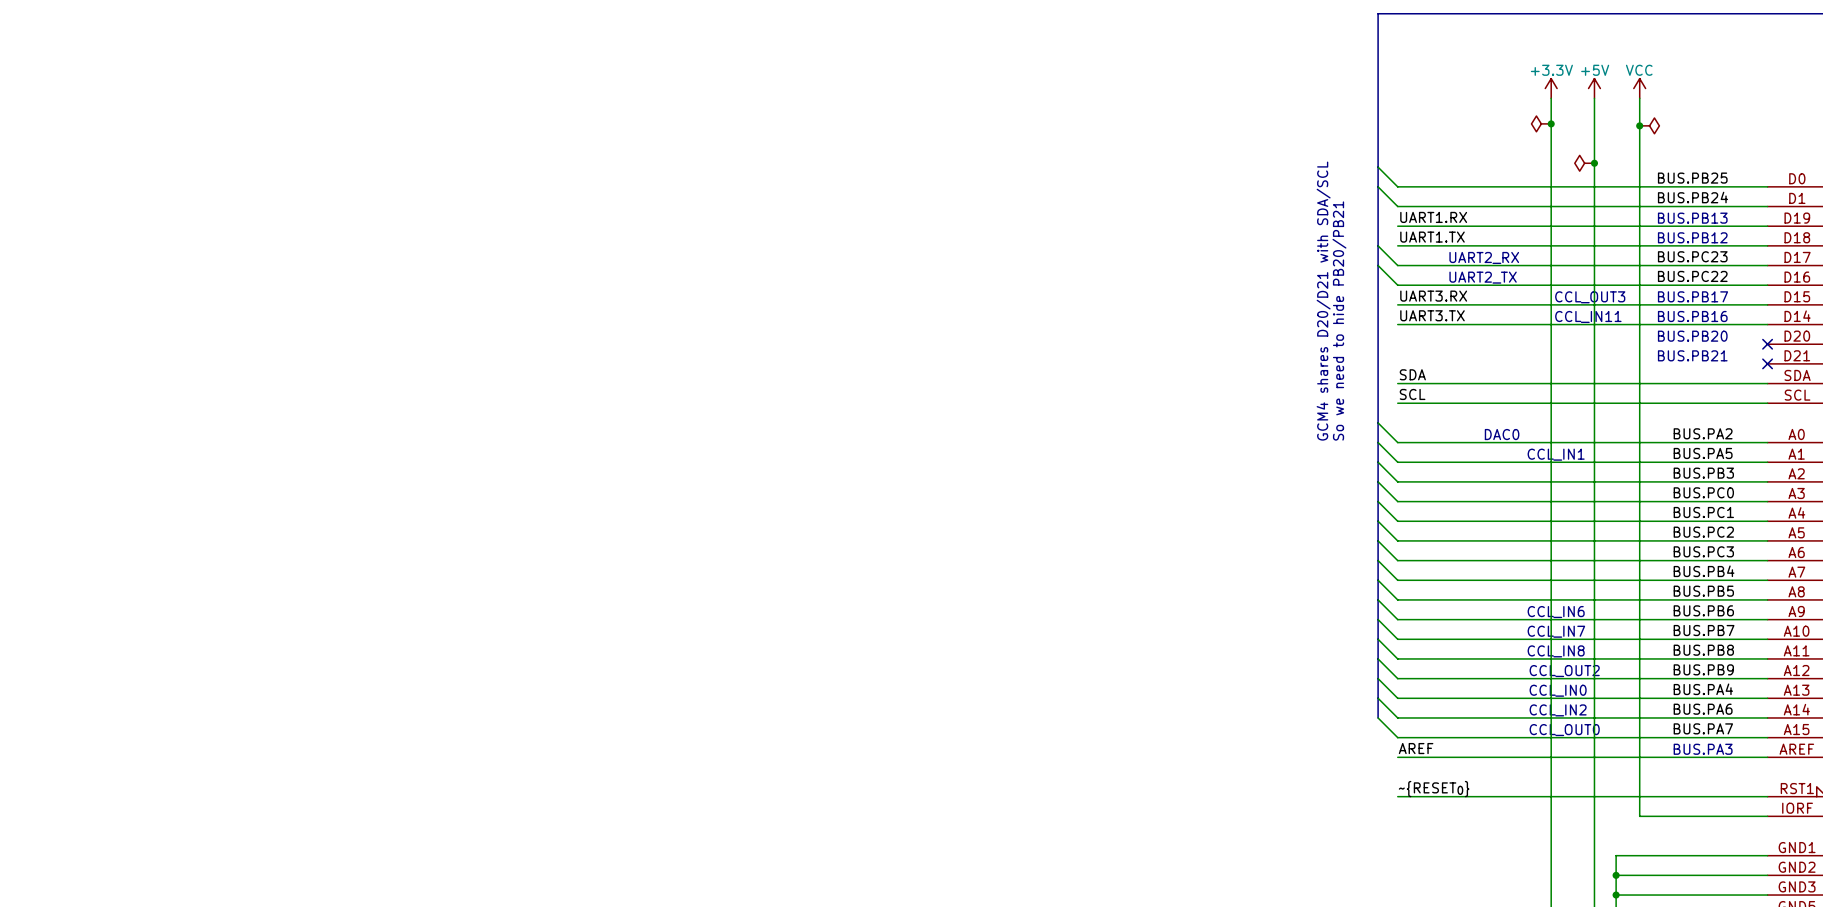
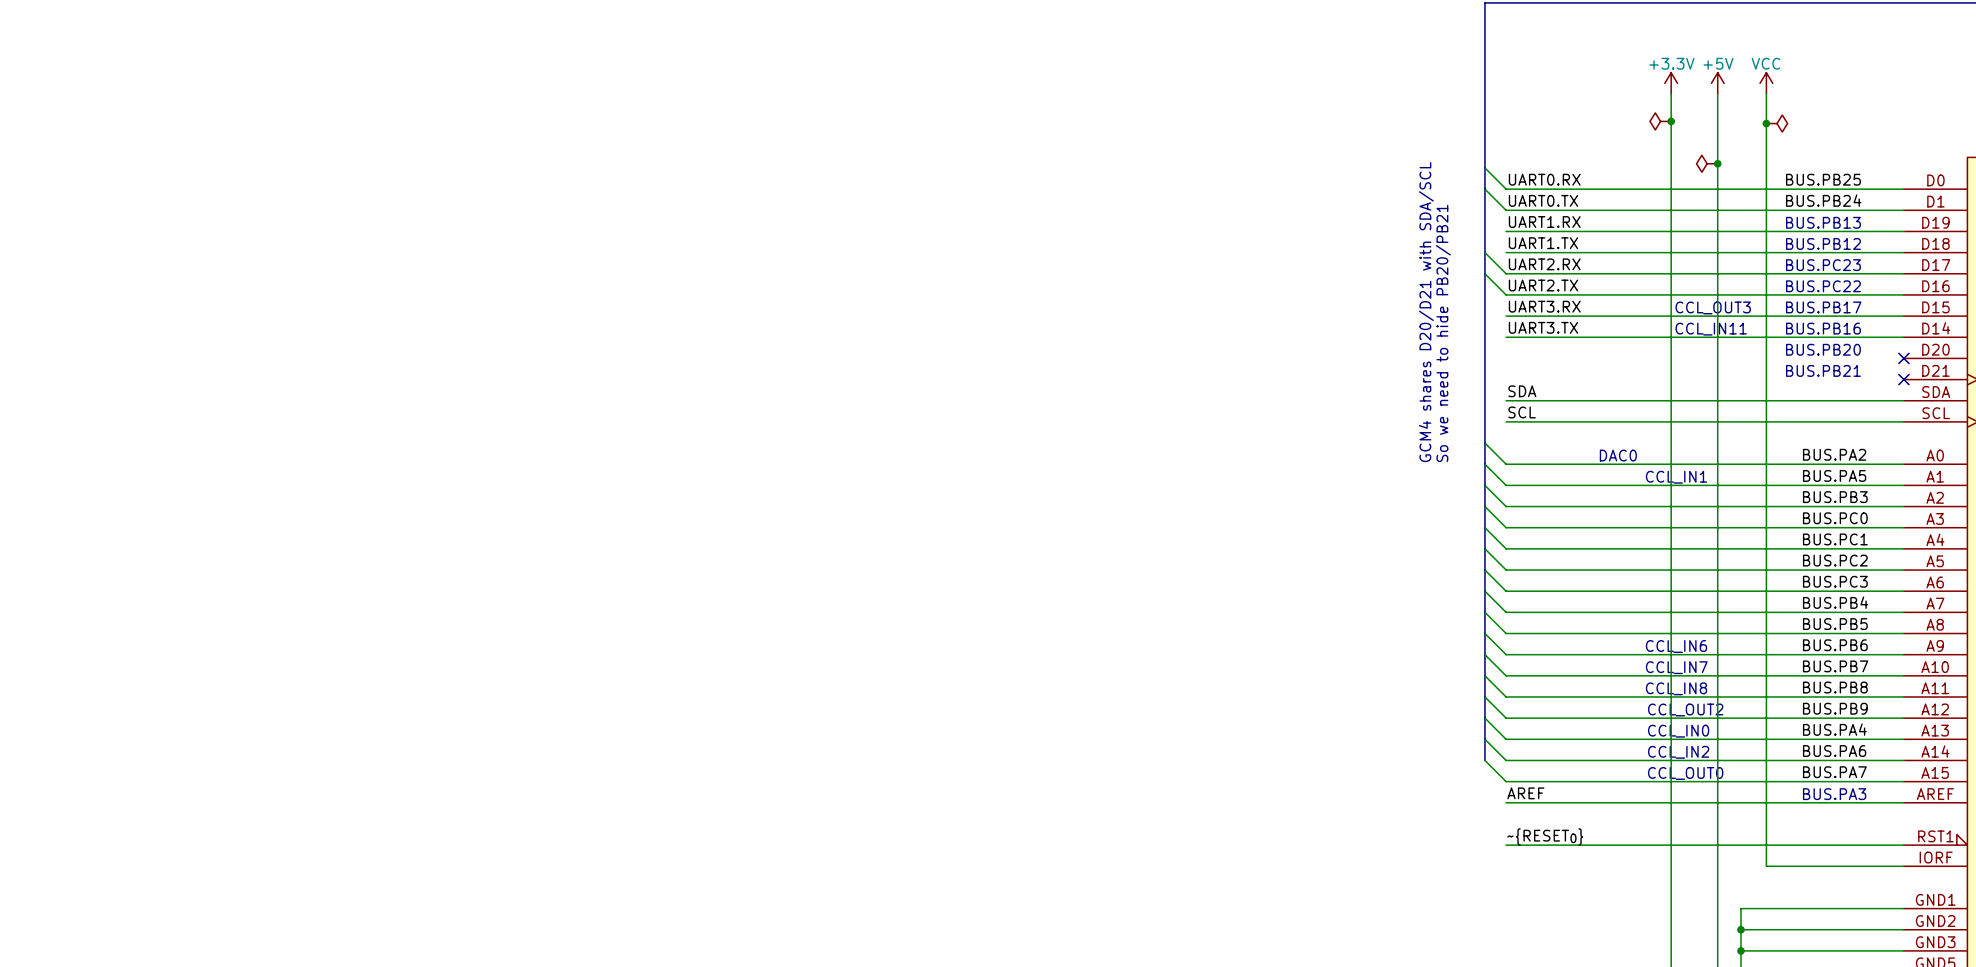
label: none -> UART0.RX (1544, 179)
label: none -> UART0.TX (1543, 200)
label: none -> UART2.RX (1544, 264)
label: BUS.PC23 (1692, 256) -> none
text: UART2_RX (1484, 257) -> none
text: none -> BUS.PC23 (1823, 265)
label: none -> UART2.TX (1543, 285)
label: BUS.PC22 (1692, 276) -> none
text: UART2_TX (1483, 277) -> none
text: none -> BUS.PC22 (1823, 286)

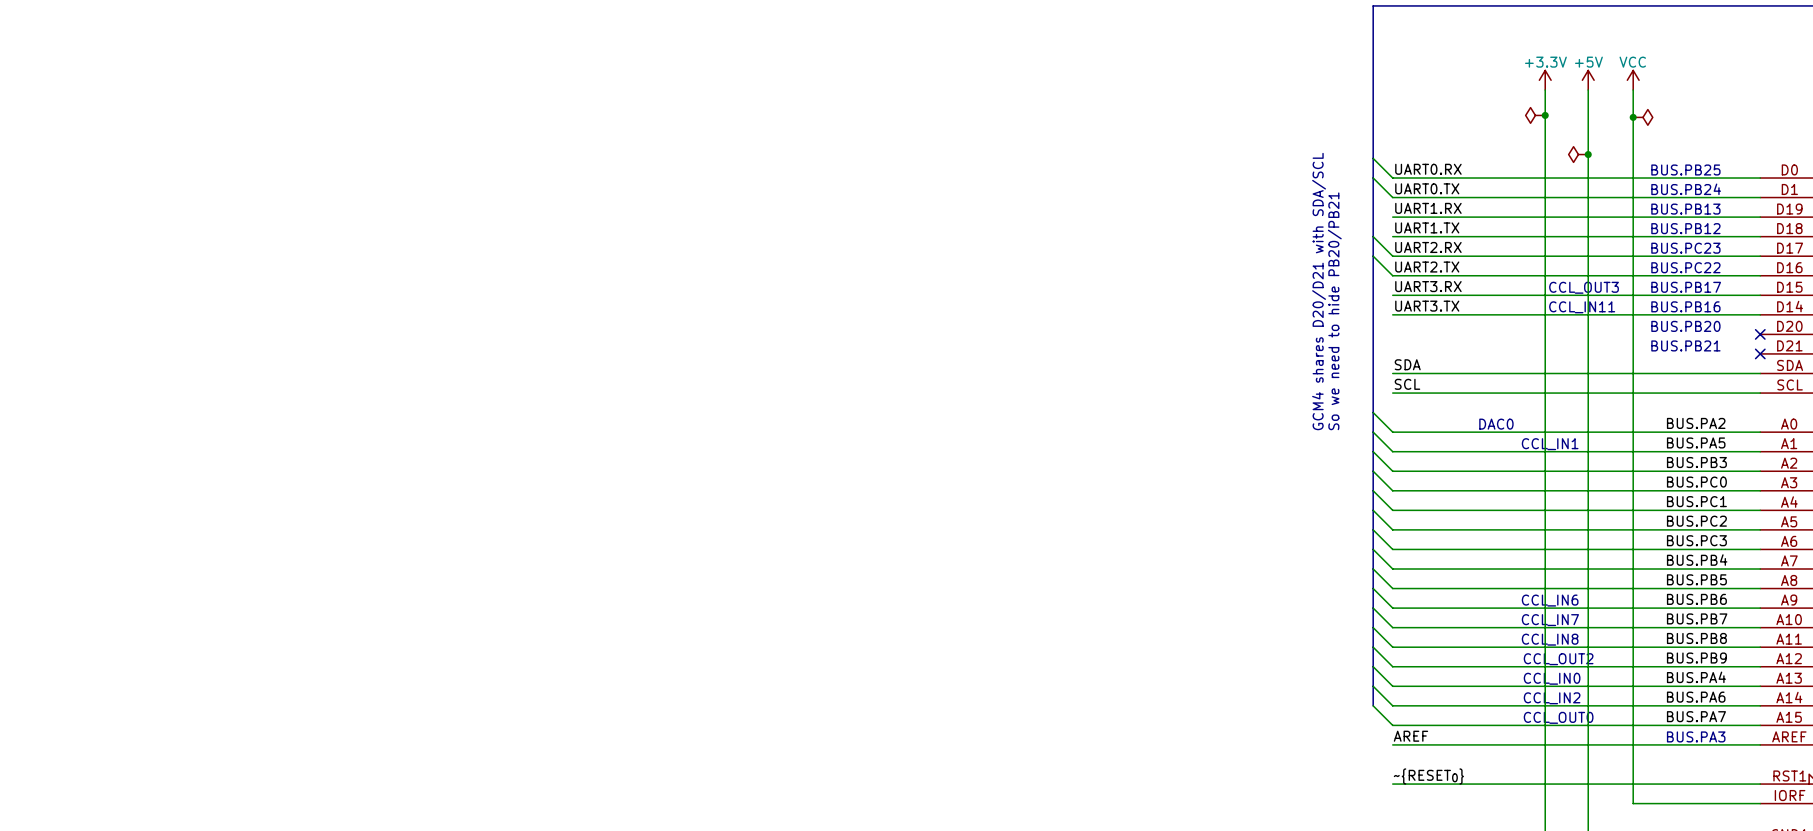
label: BUS.PB25 (1823, 179) -> none
text: none -> BUS.PB25 (1685, 169)
label: BUS.PB24 (1823, 200) -> none
text: none -> BUS.PB24 (1686, 189)

